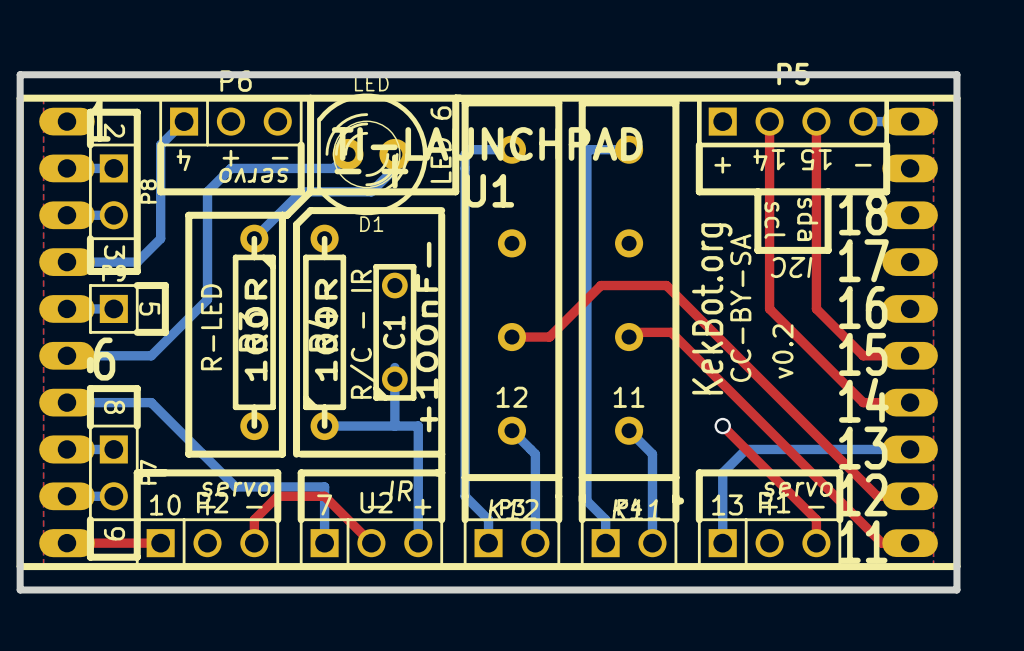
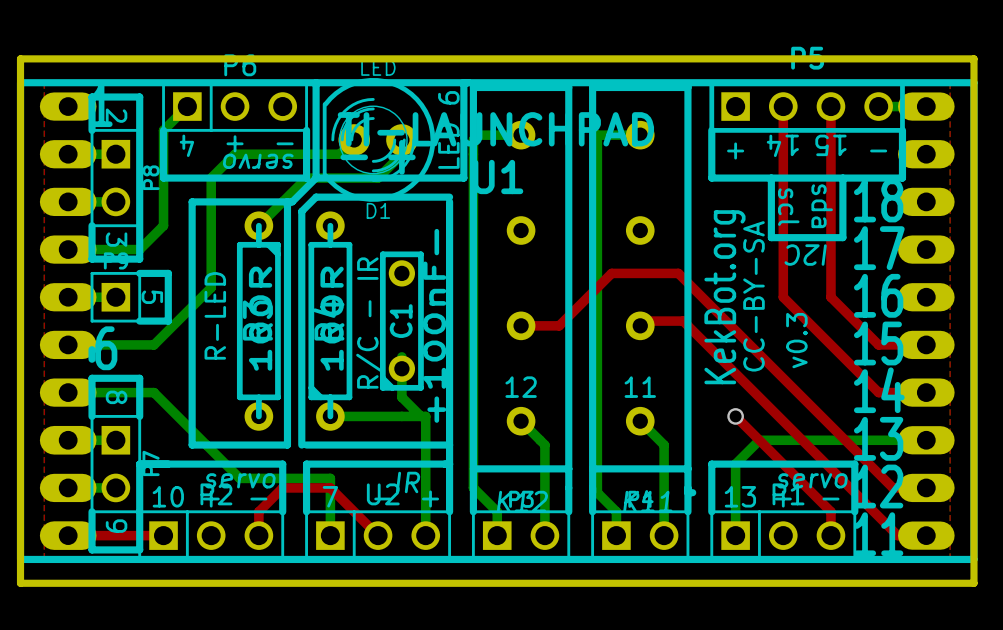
text: v0.2 (782, 351) -> v0.3 (796, 340)
bottom track: (394, 407) (394, 426) -> (401, 397) (420, 416)

